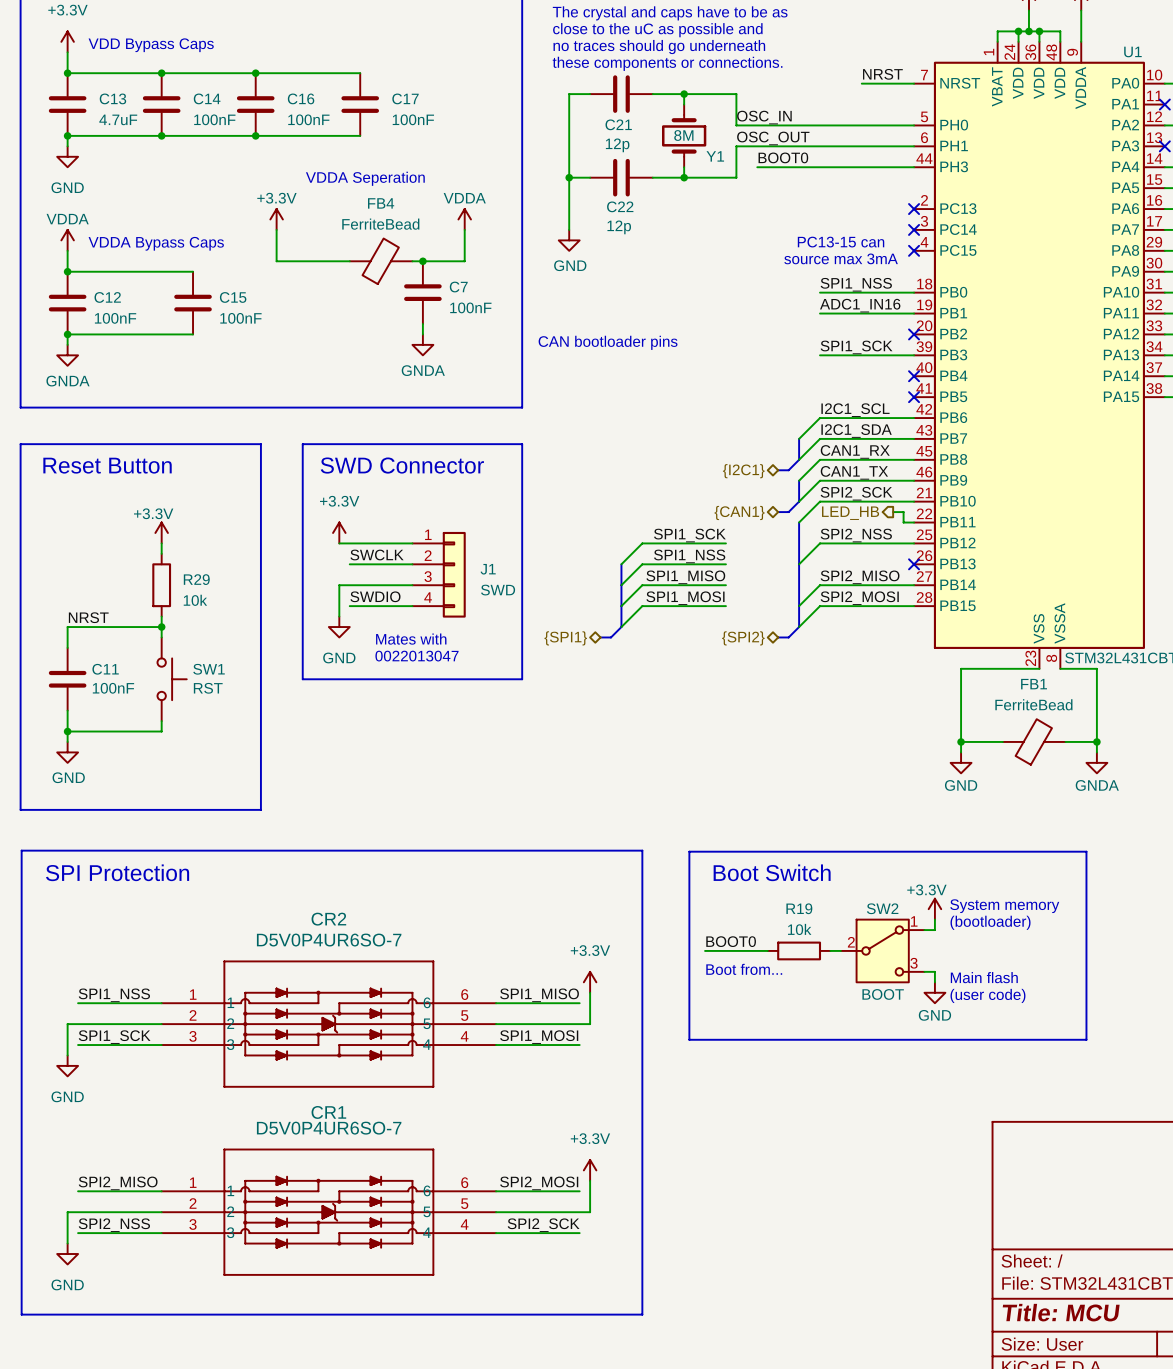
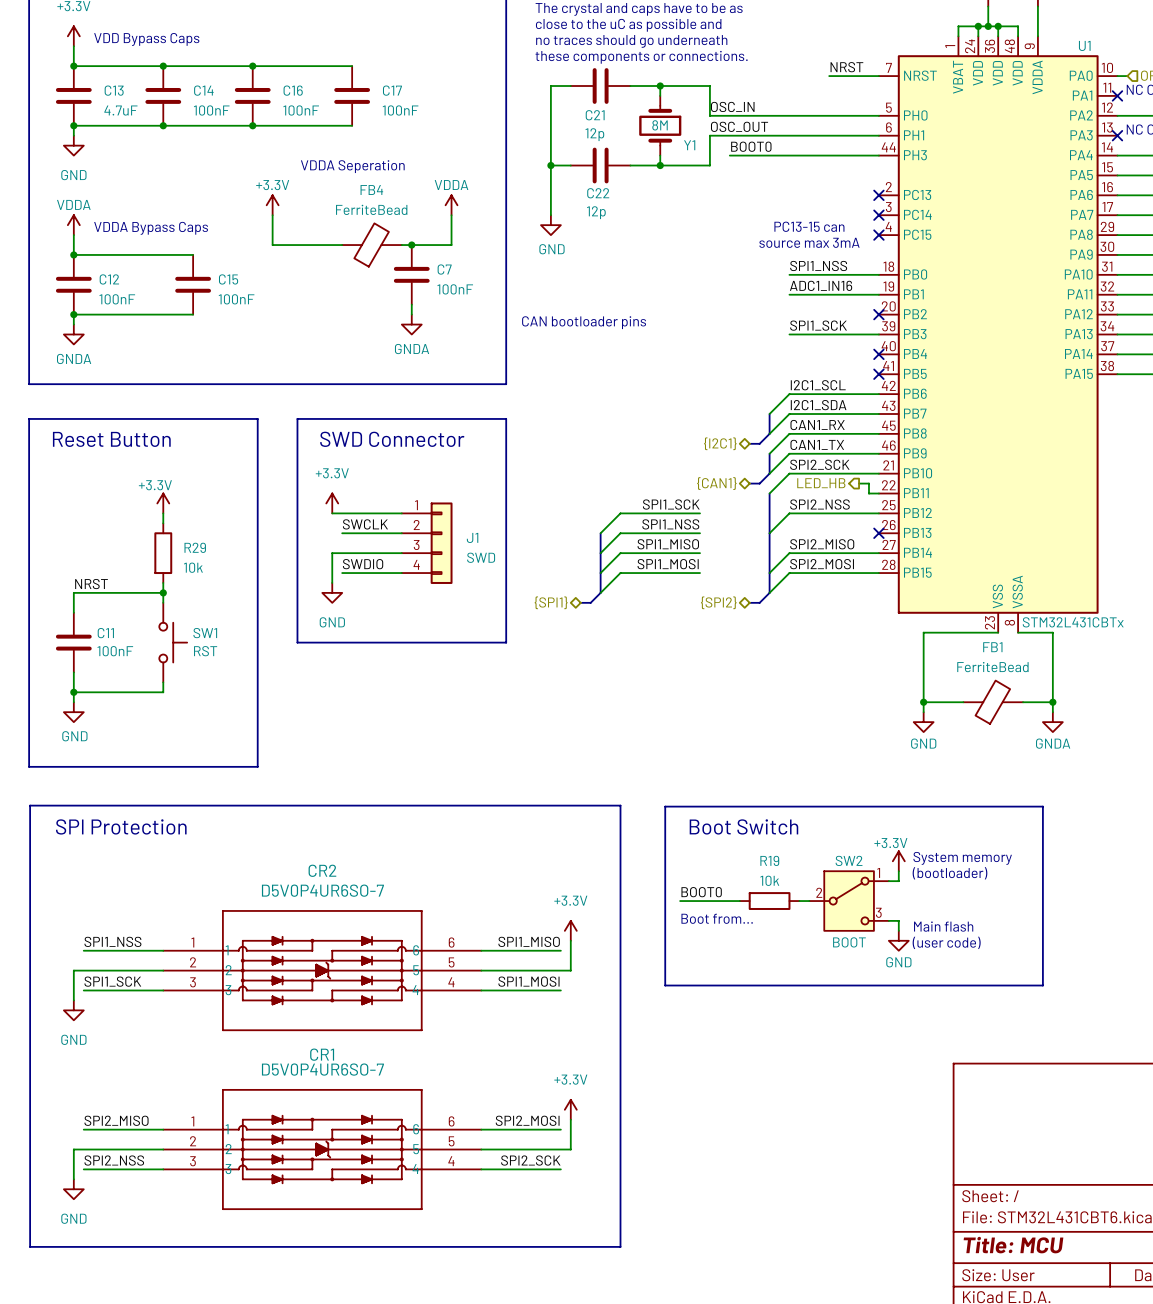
text: Mates with (411, 639) -> none
text: 0022013047 (416, 656) -> none

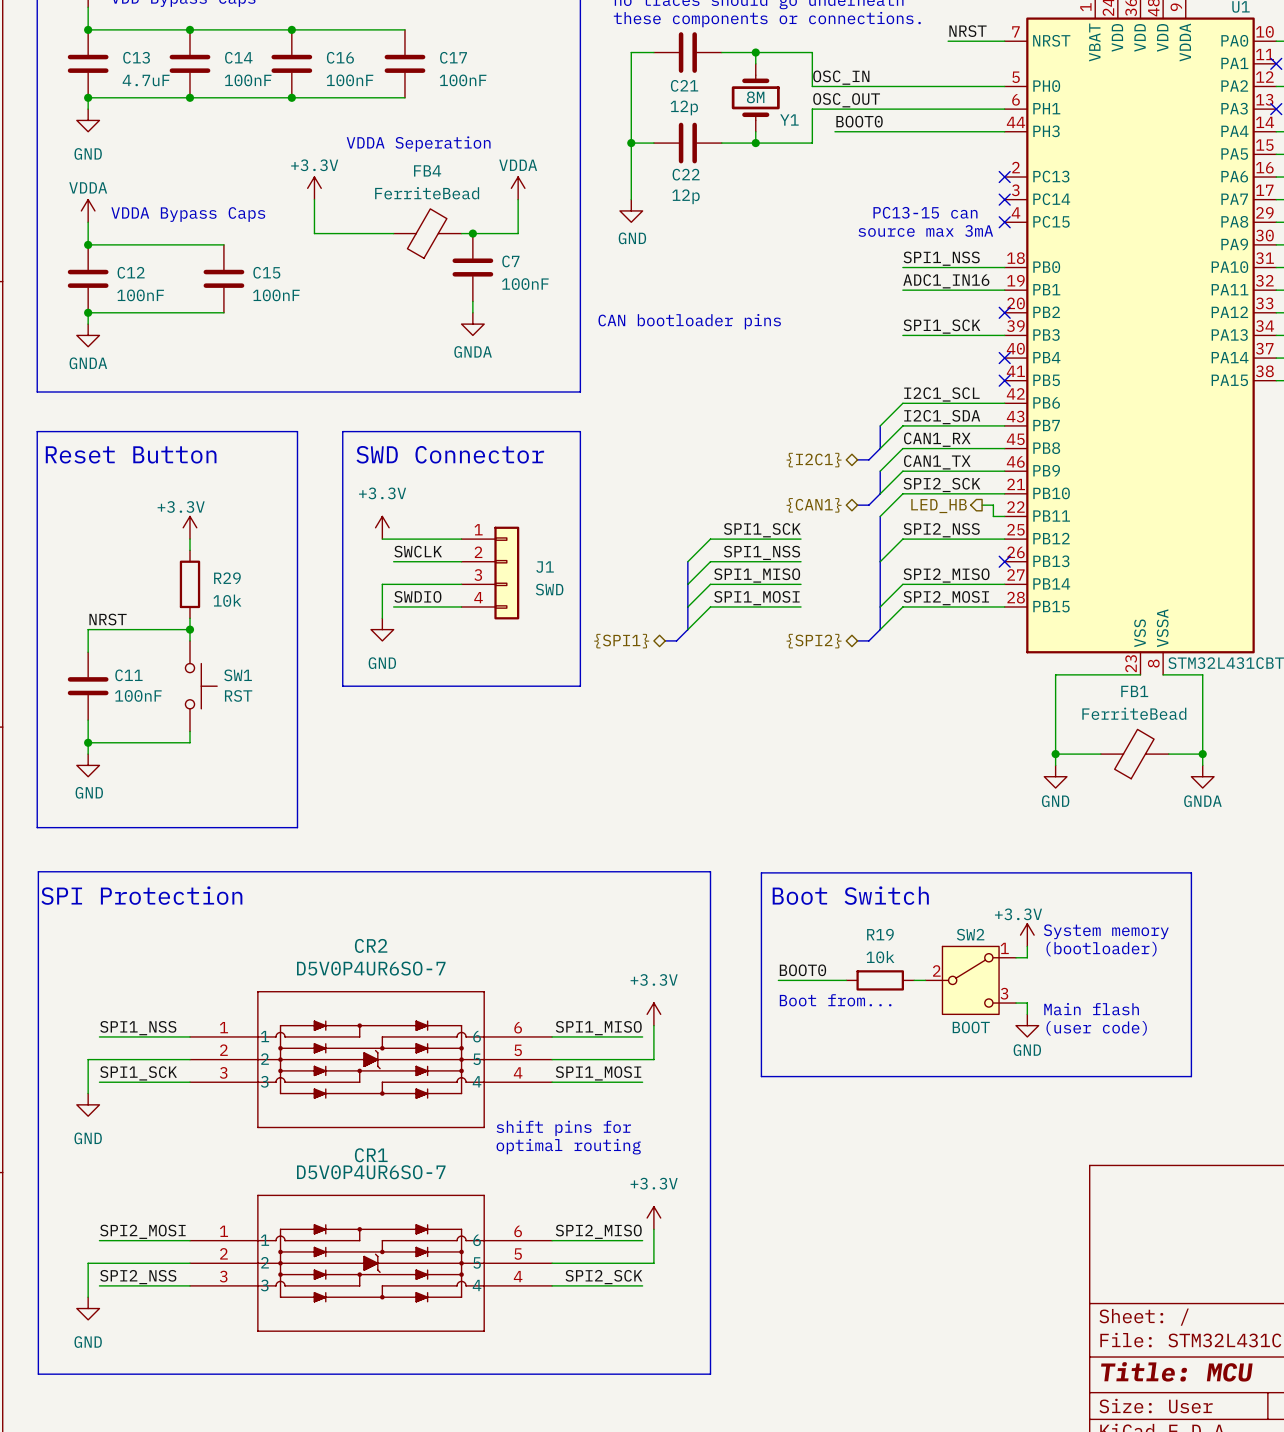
text: none -> shift pins for (563, 1128)
text: none -> optimal routing (568, 1146)
label: SPI2_MISO (116, 1120) -> SPI2_MOSI (142, 1231)
label: SPI2_MOSI (527, 1120) -> SPI2_MISO (598, 1231)

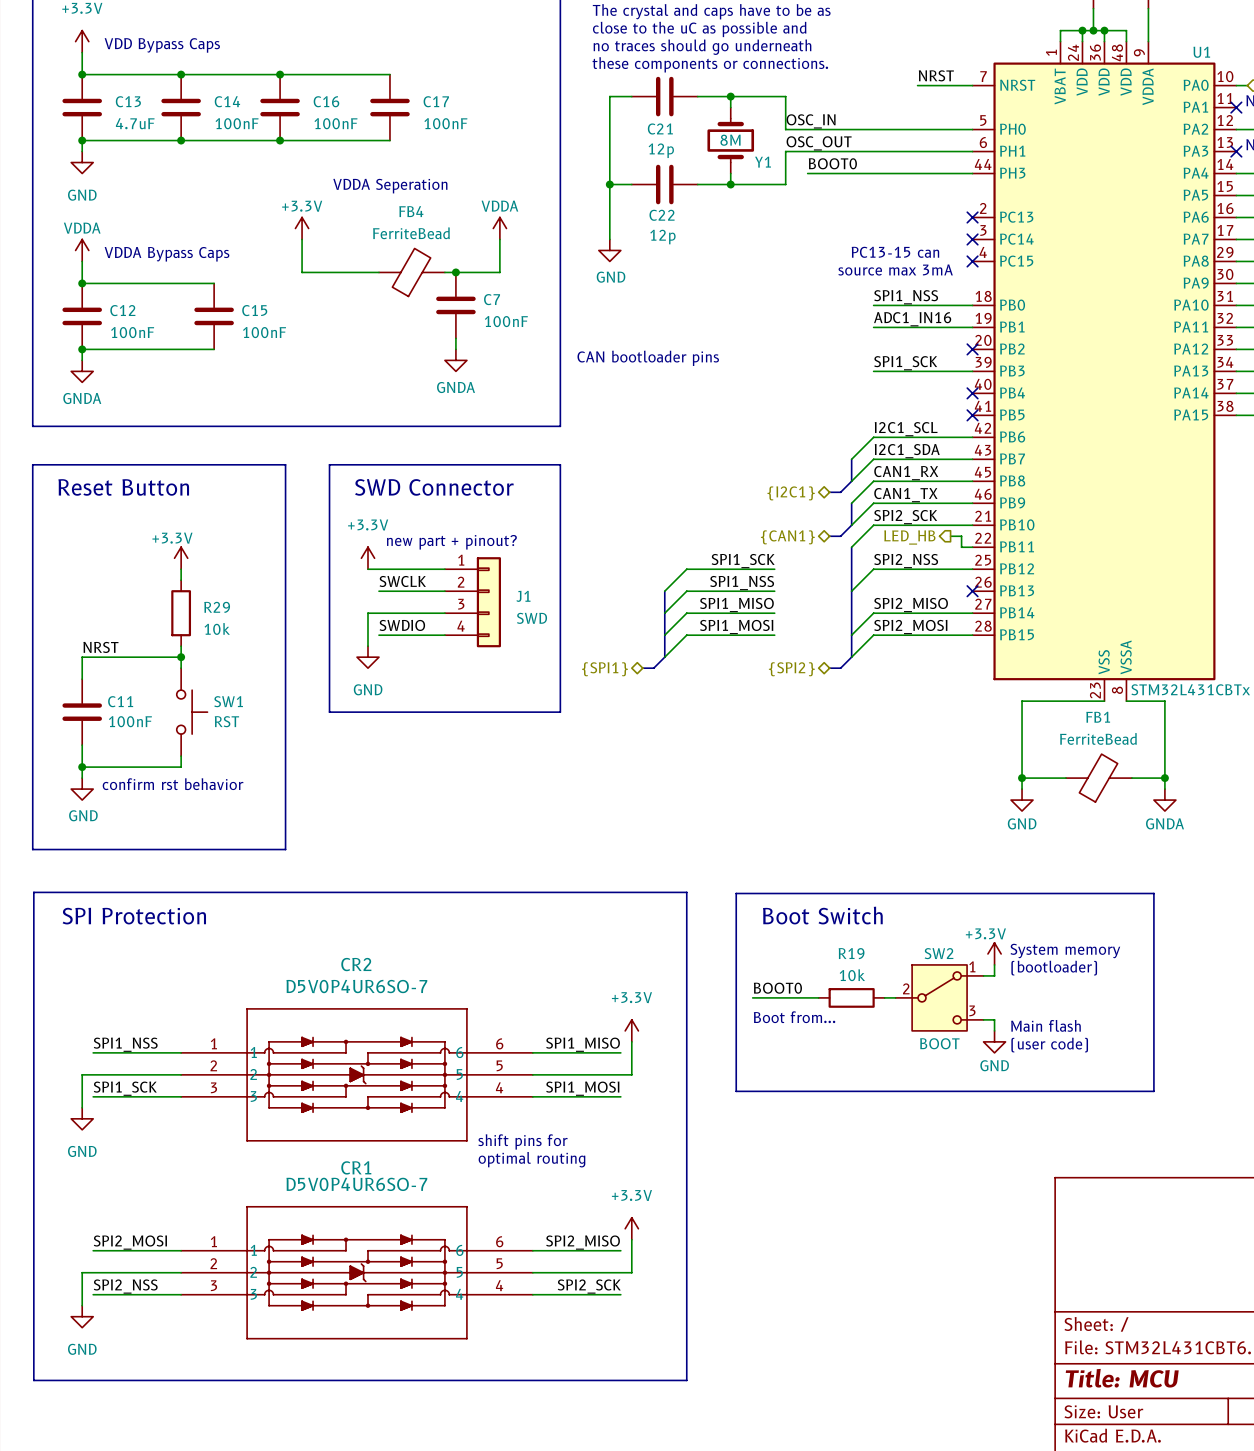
text: none -> new part + pinout? (451, 542)
text: none -> confirm rst behavior (173, 784)

